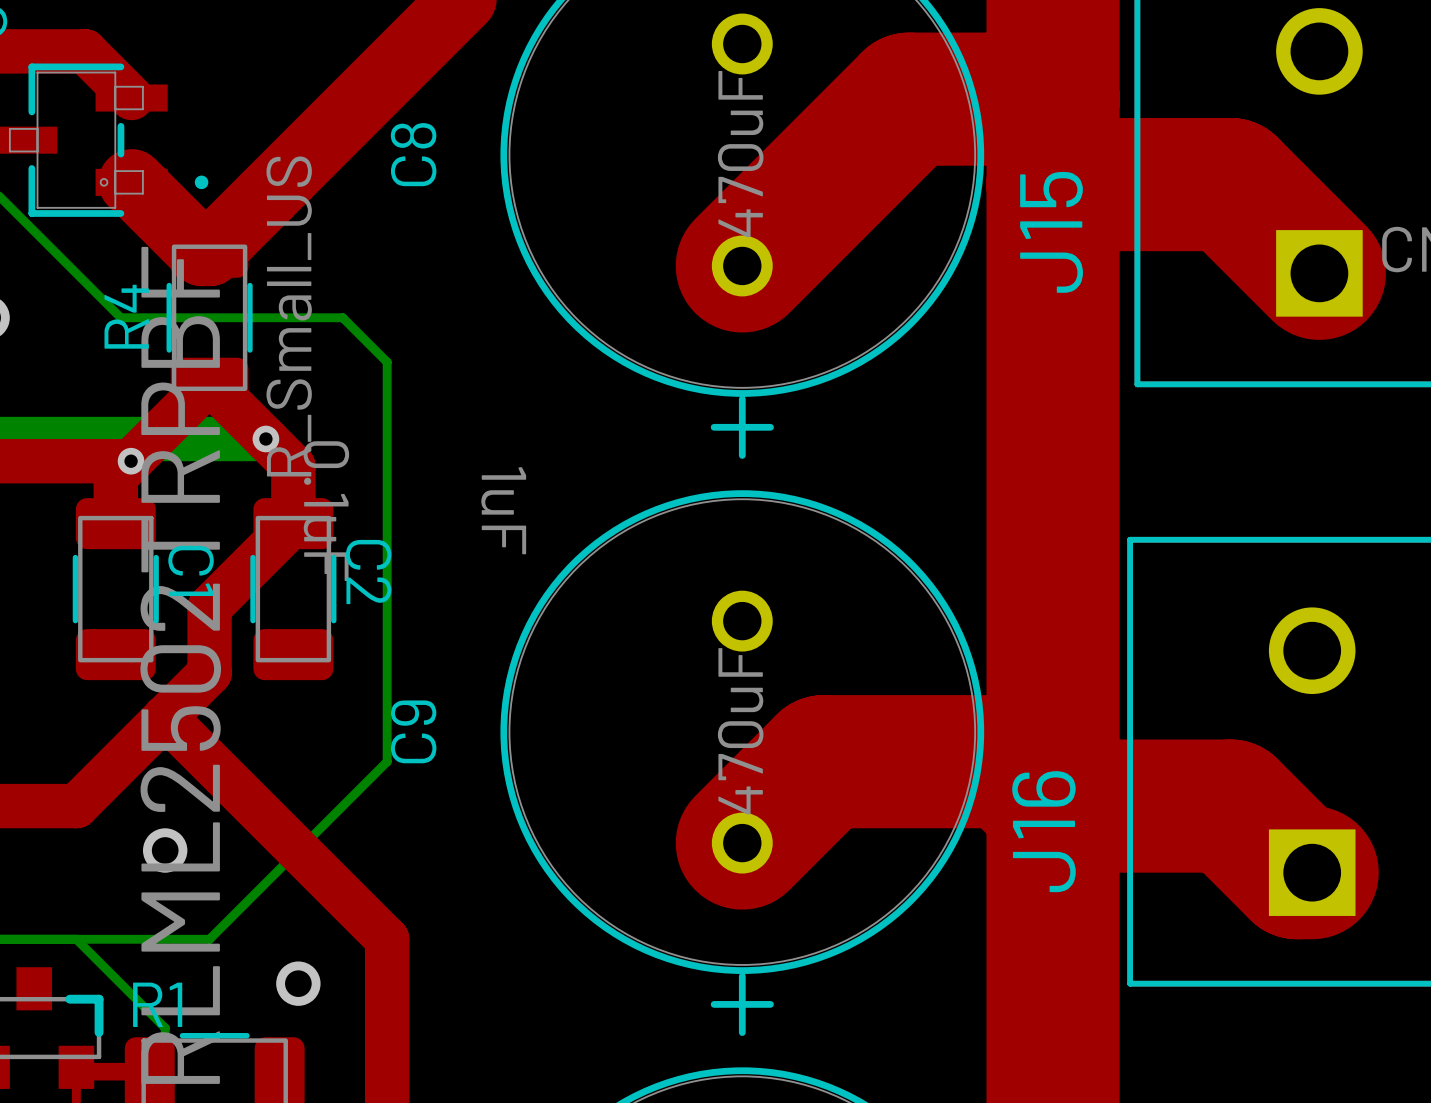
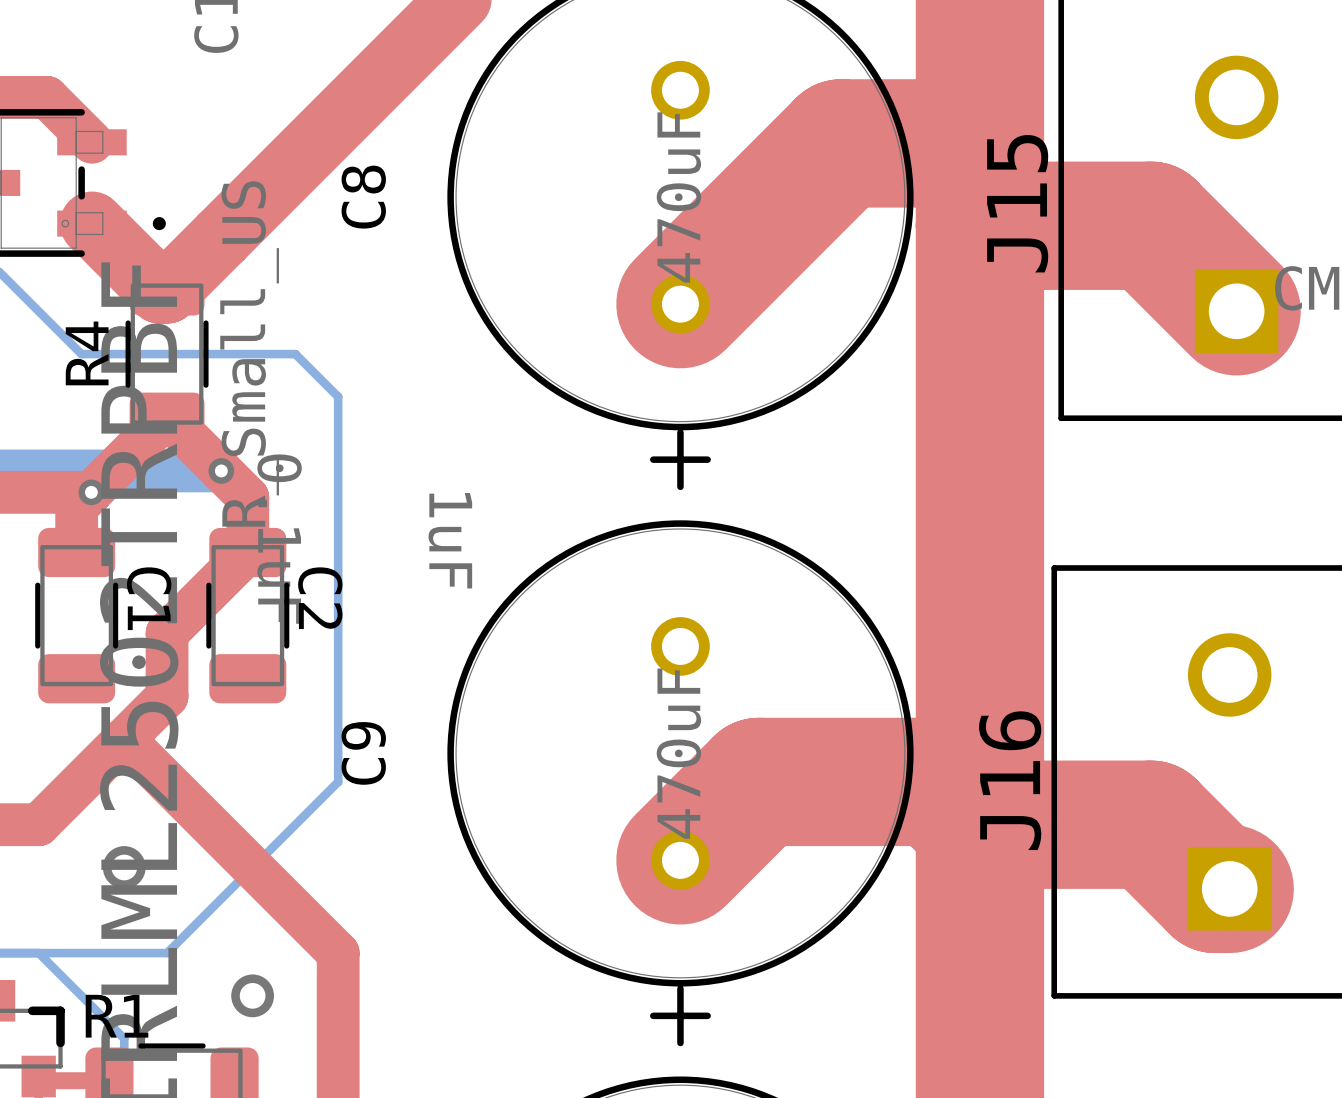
J15 name position: J15 (1051, 232) -> J15 (1017, 203)
J16 name position: J16 (1044, 831) -> J16 (1010, 780)

